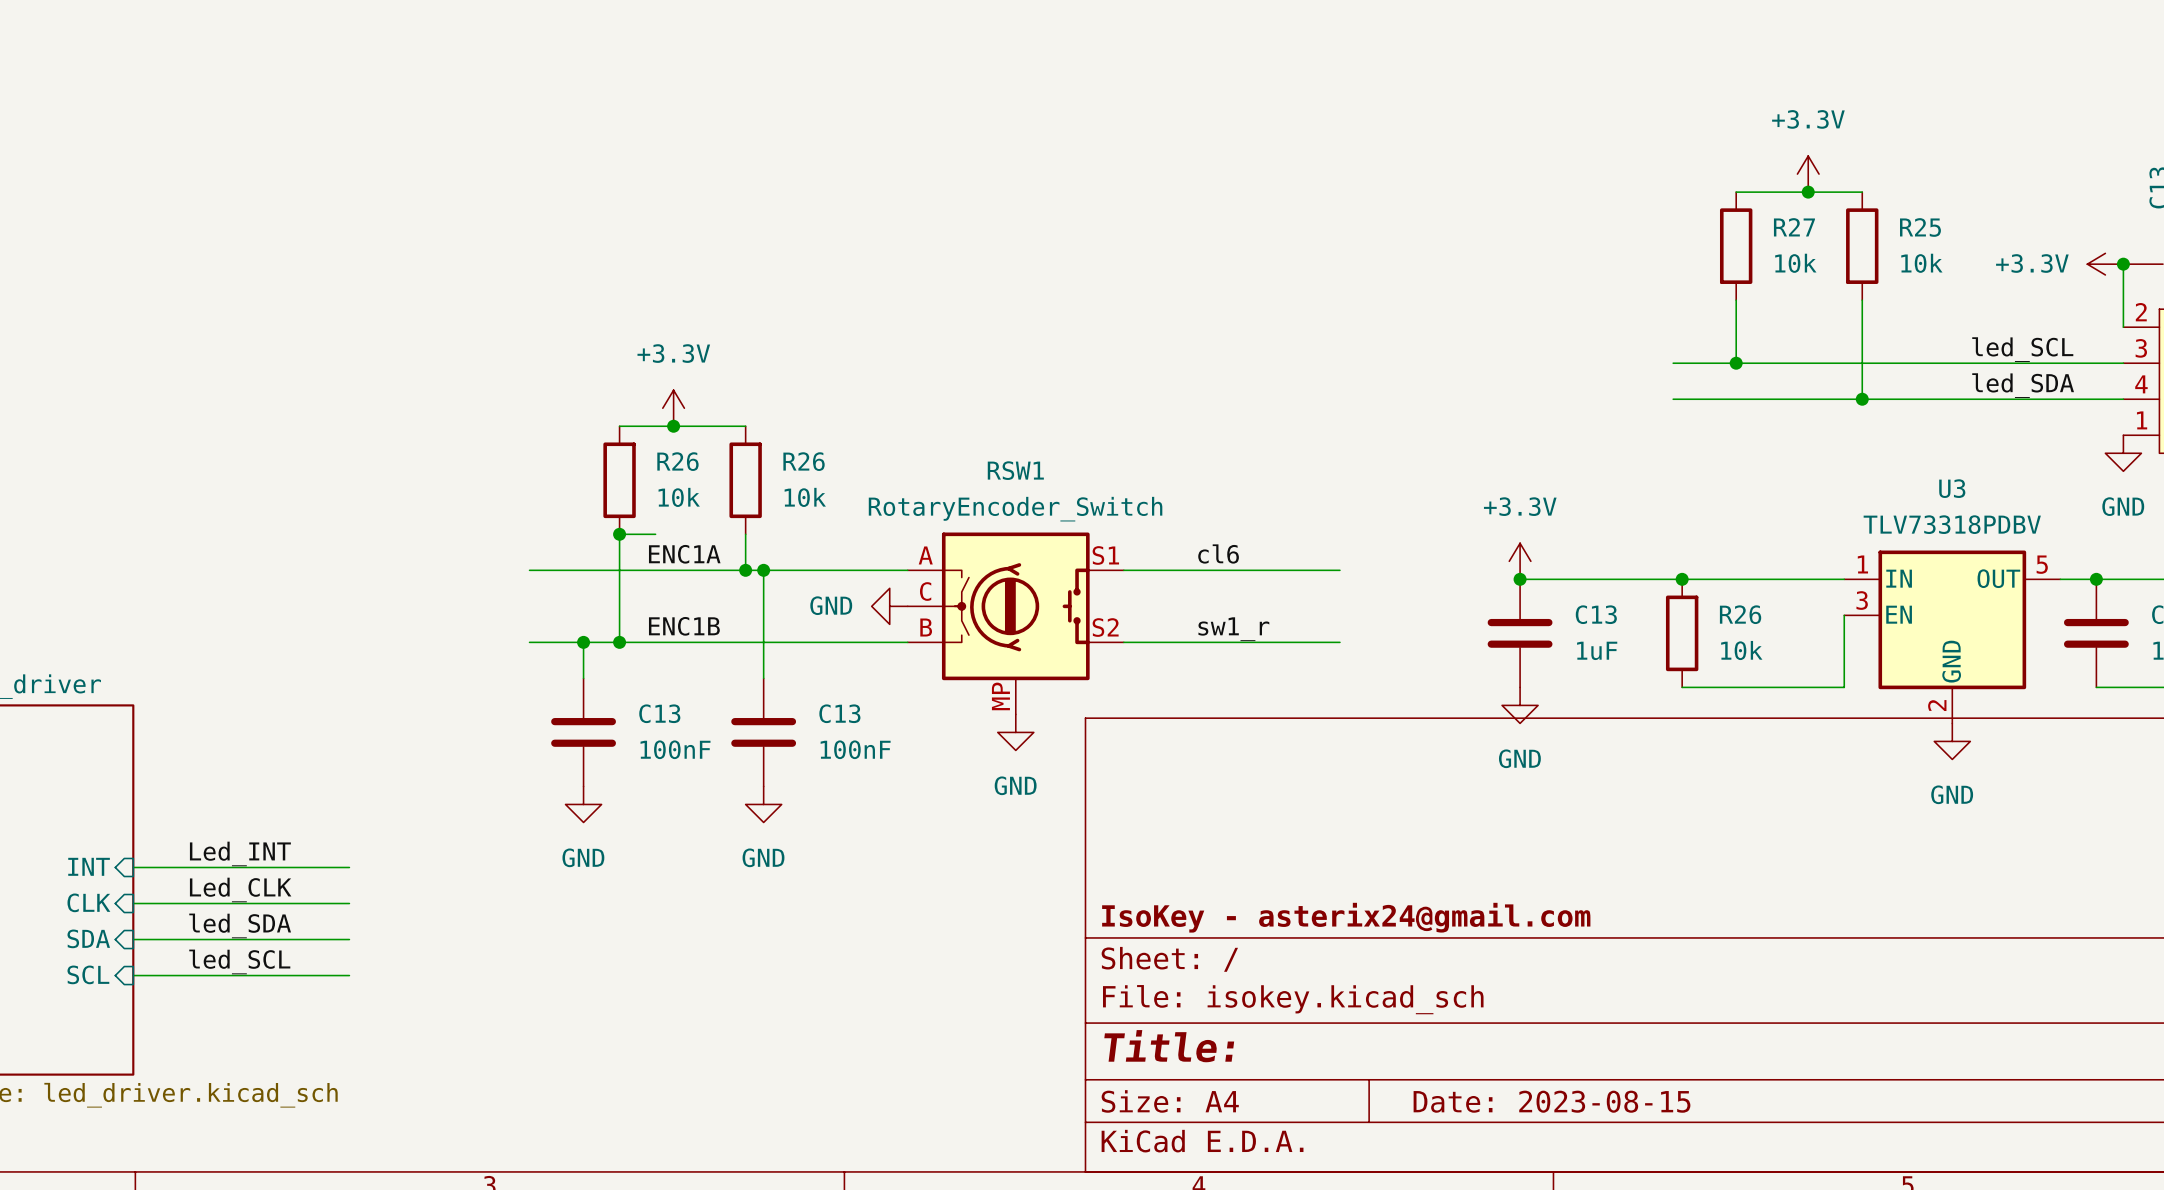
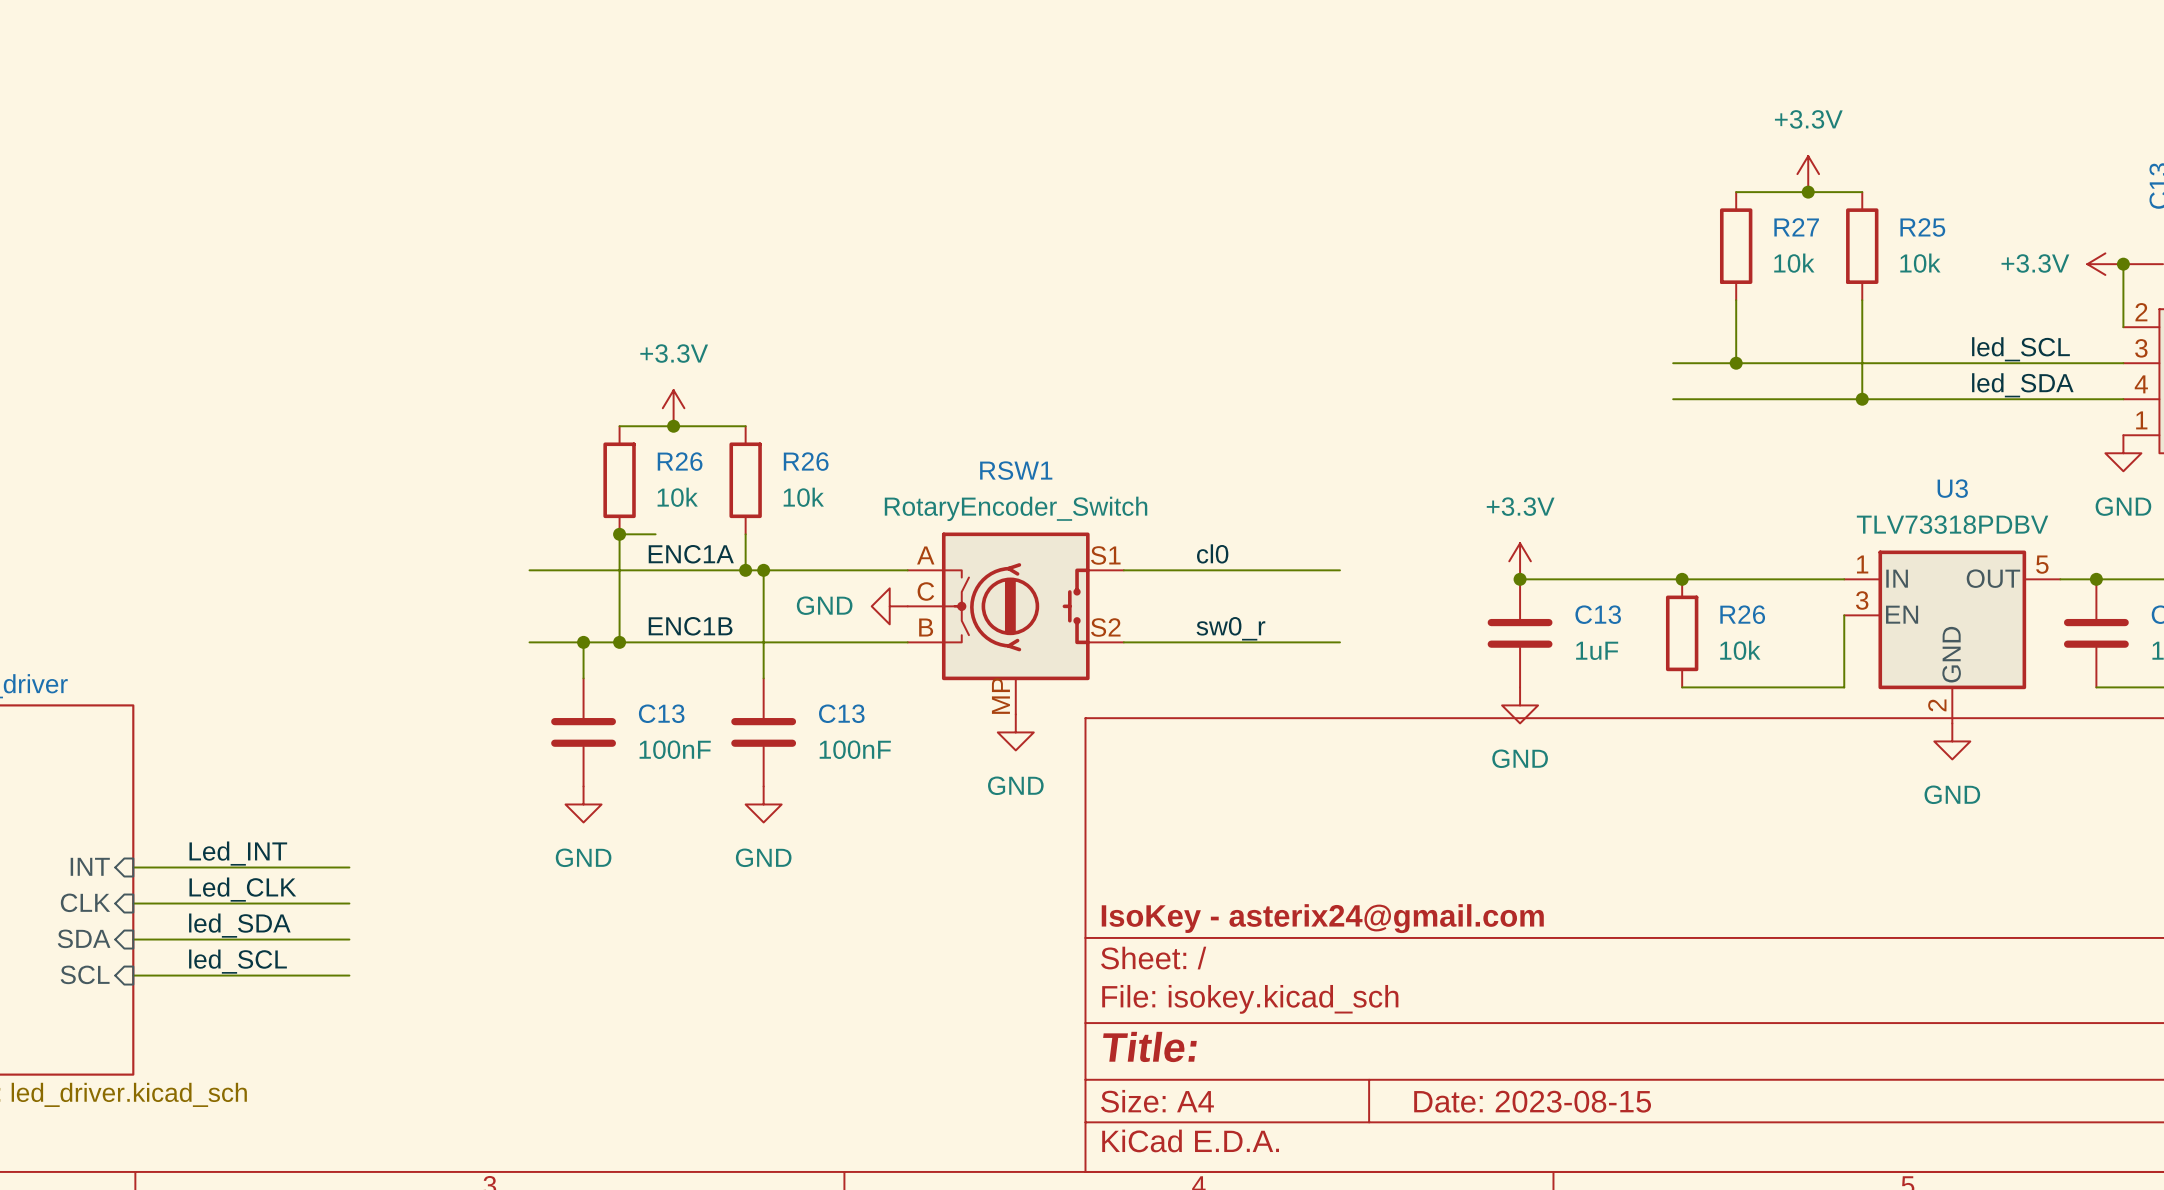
label: cl6 (1218, 553) -> cl0 (1212, 553)
label: sw1_r (1233, 629) -> sw0_r (1230, 628)

